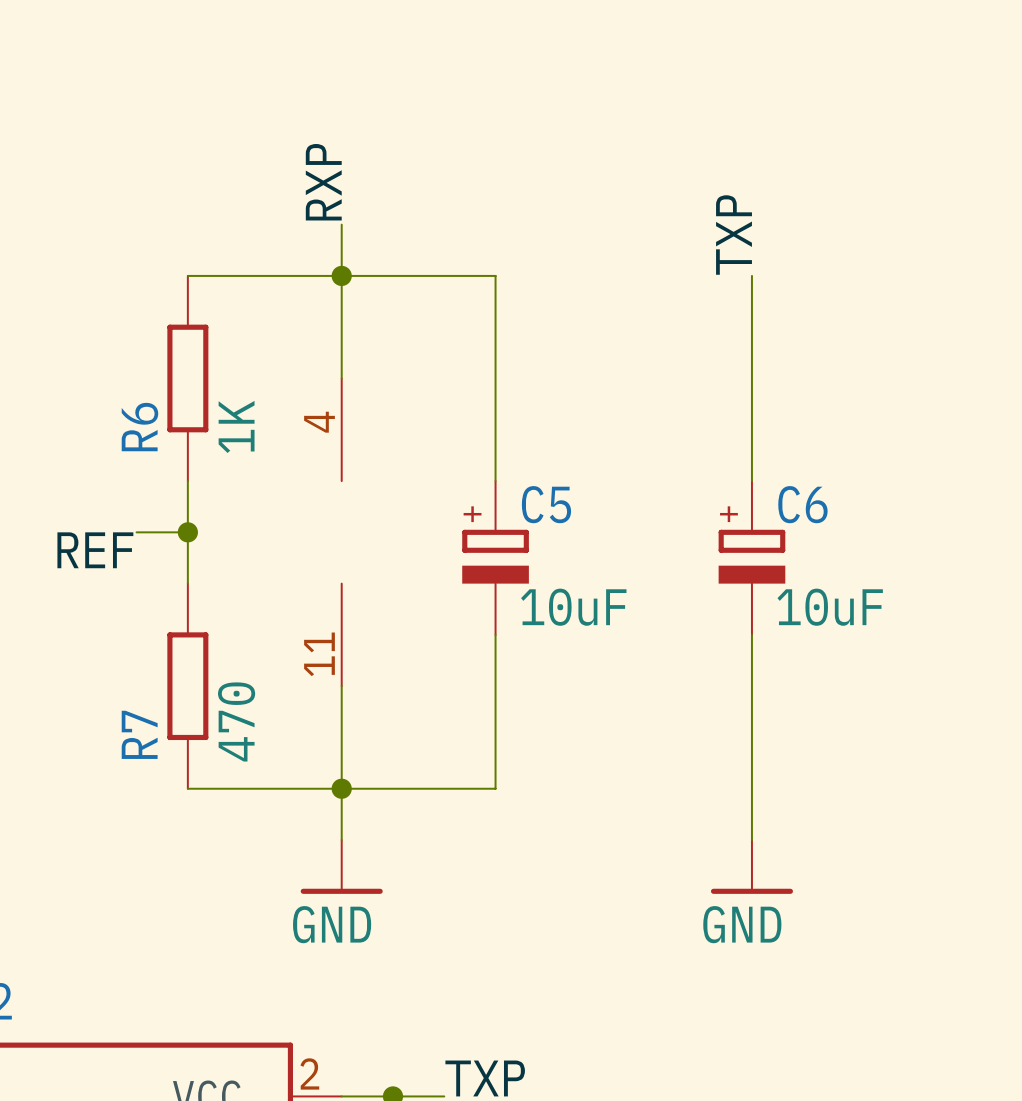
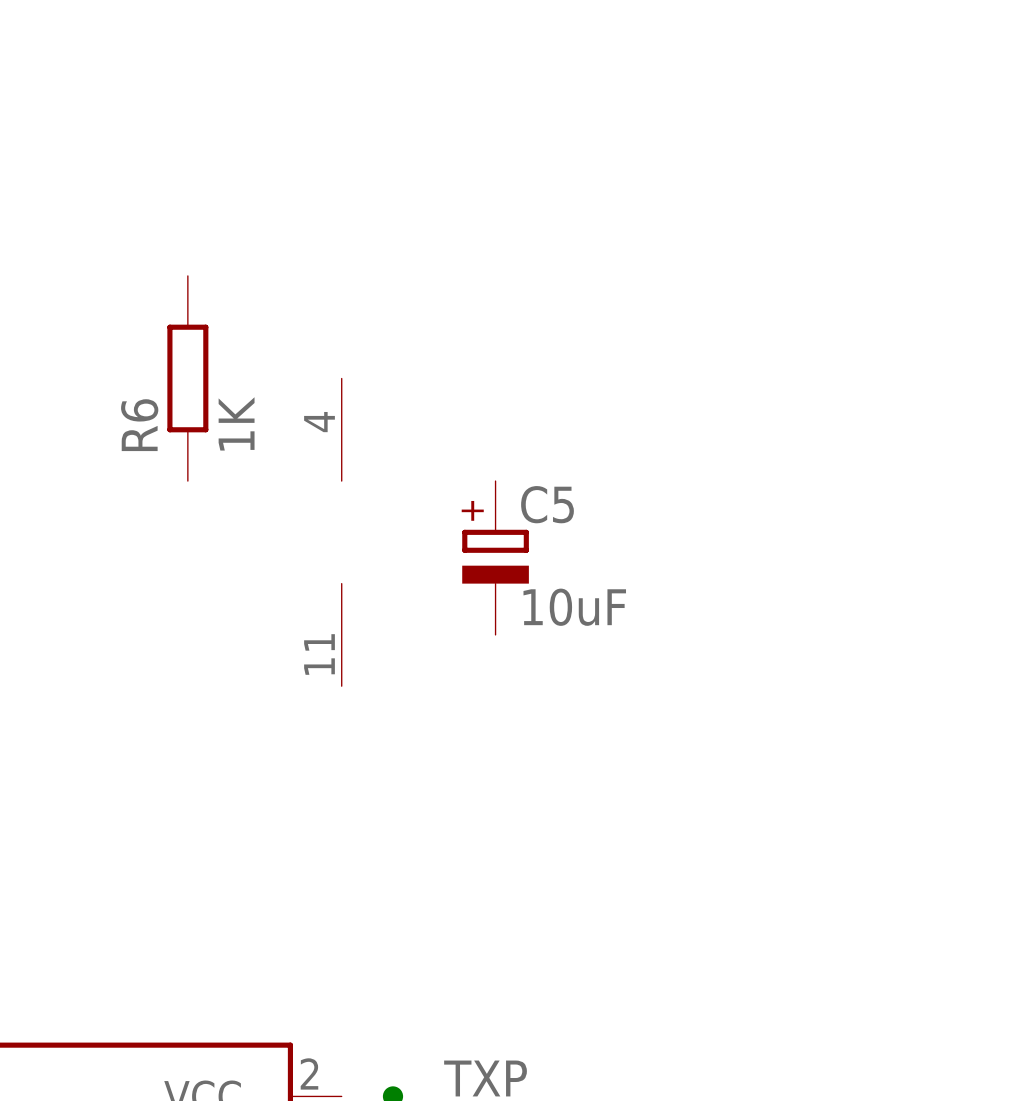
label: RXP (323, 182) -> none
wire: (341, 224) (341, 378) -> none
label: TXP (734, 235) -> none
wire: (187, 275) (495, 275) (495, 481) -> none
junction: (341, 275) -> none
wire: (751, 275) (751, 481) -> none
wire: (187, 481) (187, 583) -> none
wire: (136, 532) (187, 532) -> none
junction: (187, 532) -> none
label: REF (95, 550) -> none
C6: 10uF (751, 557) -> none
wire: (495, 634) (495, 788) (187, 788) -> none
wire: (751, 634) (751, 840) -> none
R7: 470 (187, 686) -> none
wire: (341, 686) (341, 840) -> none
junction: (341, 788) -> none
power symbol: GND (341, 866) -> none
power symbol: GND (751, 866) -> none
wire: (341, 1096) (444, 1096) -> none

